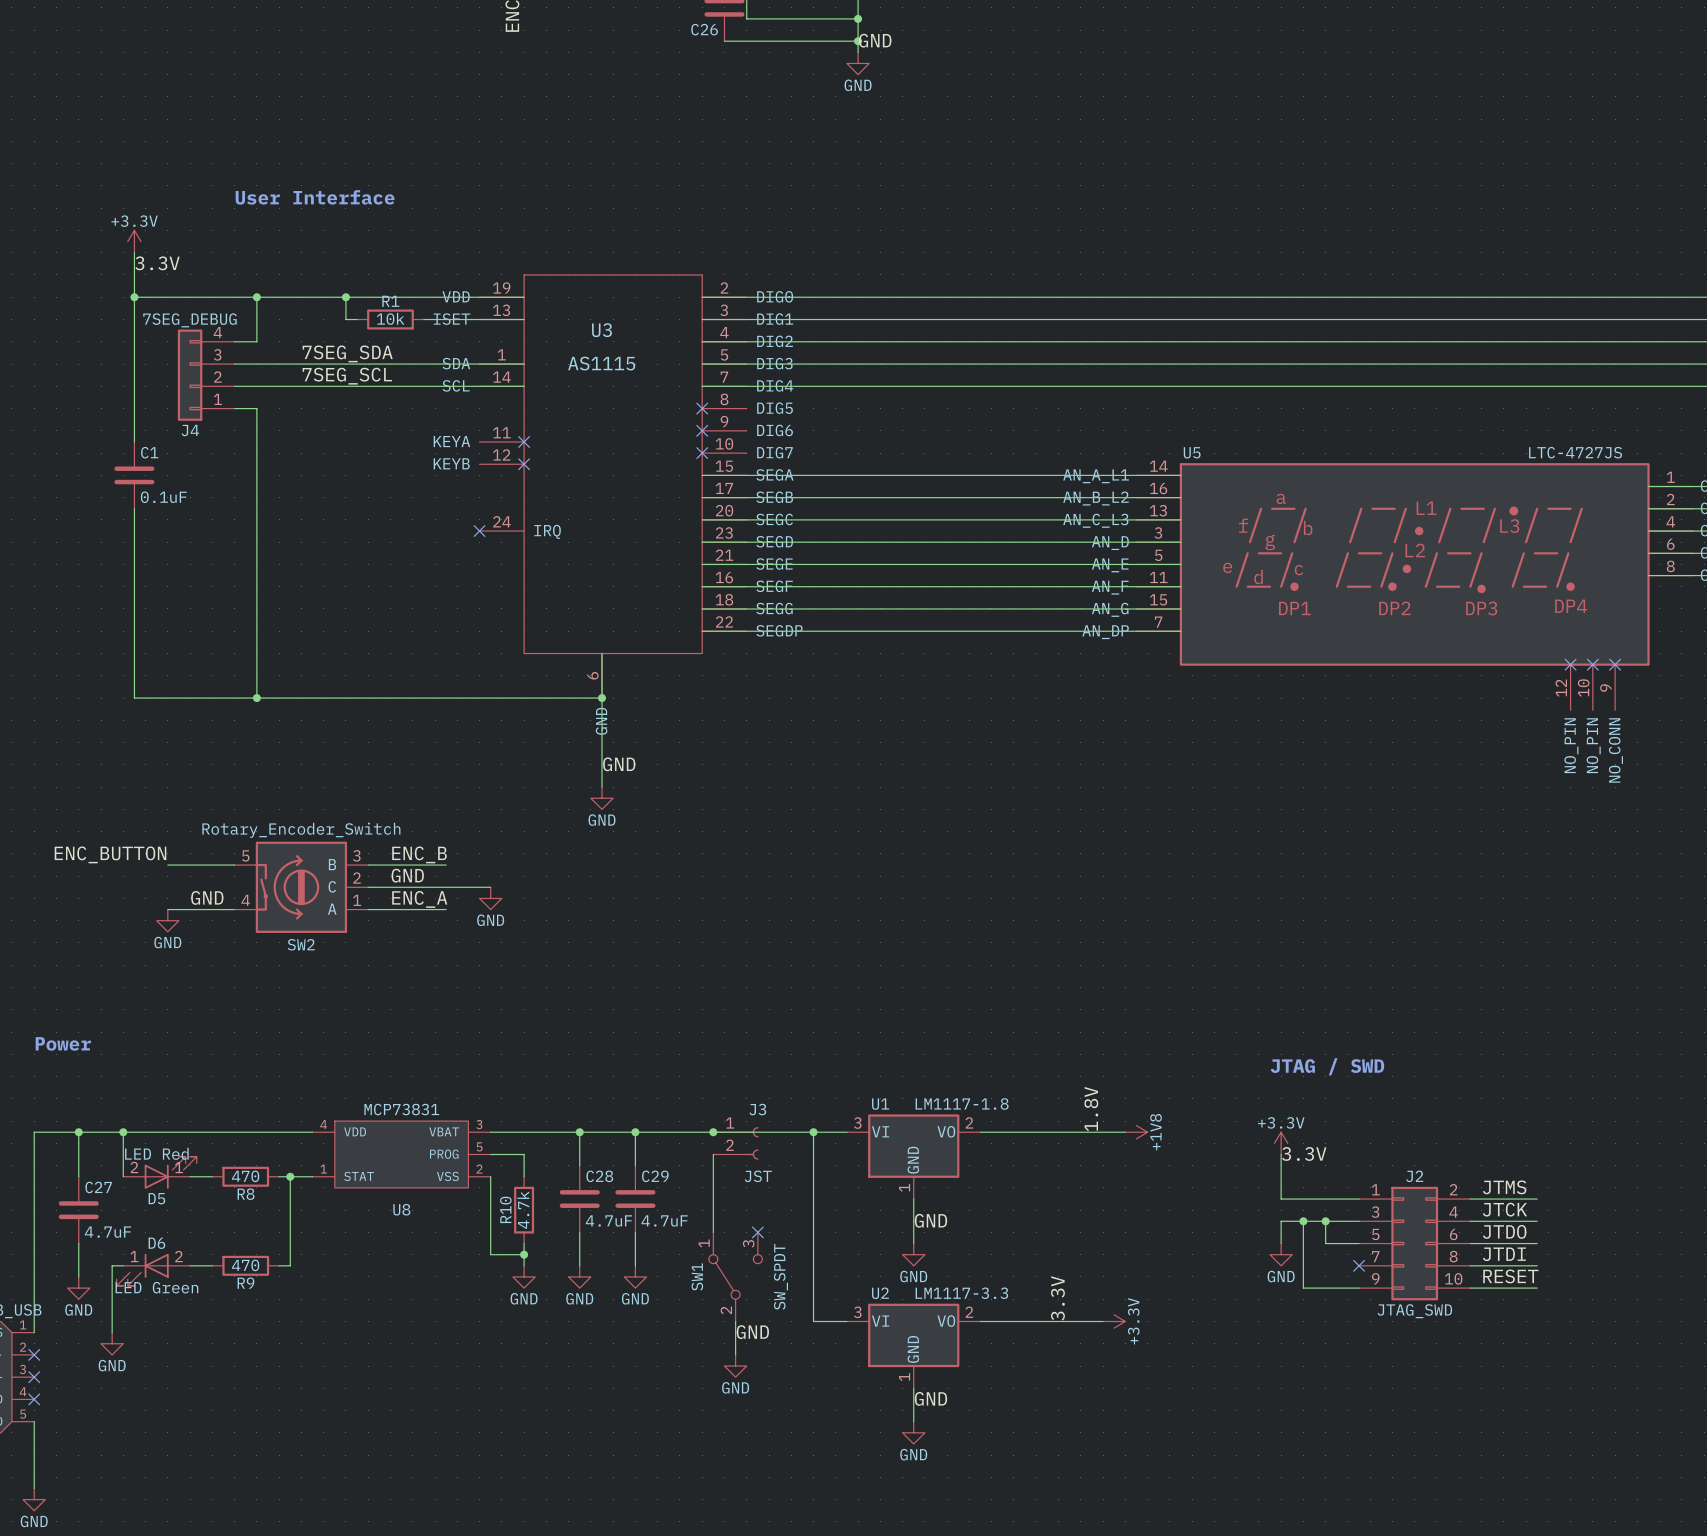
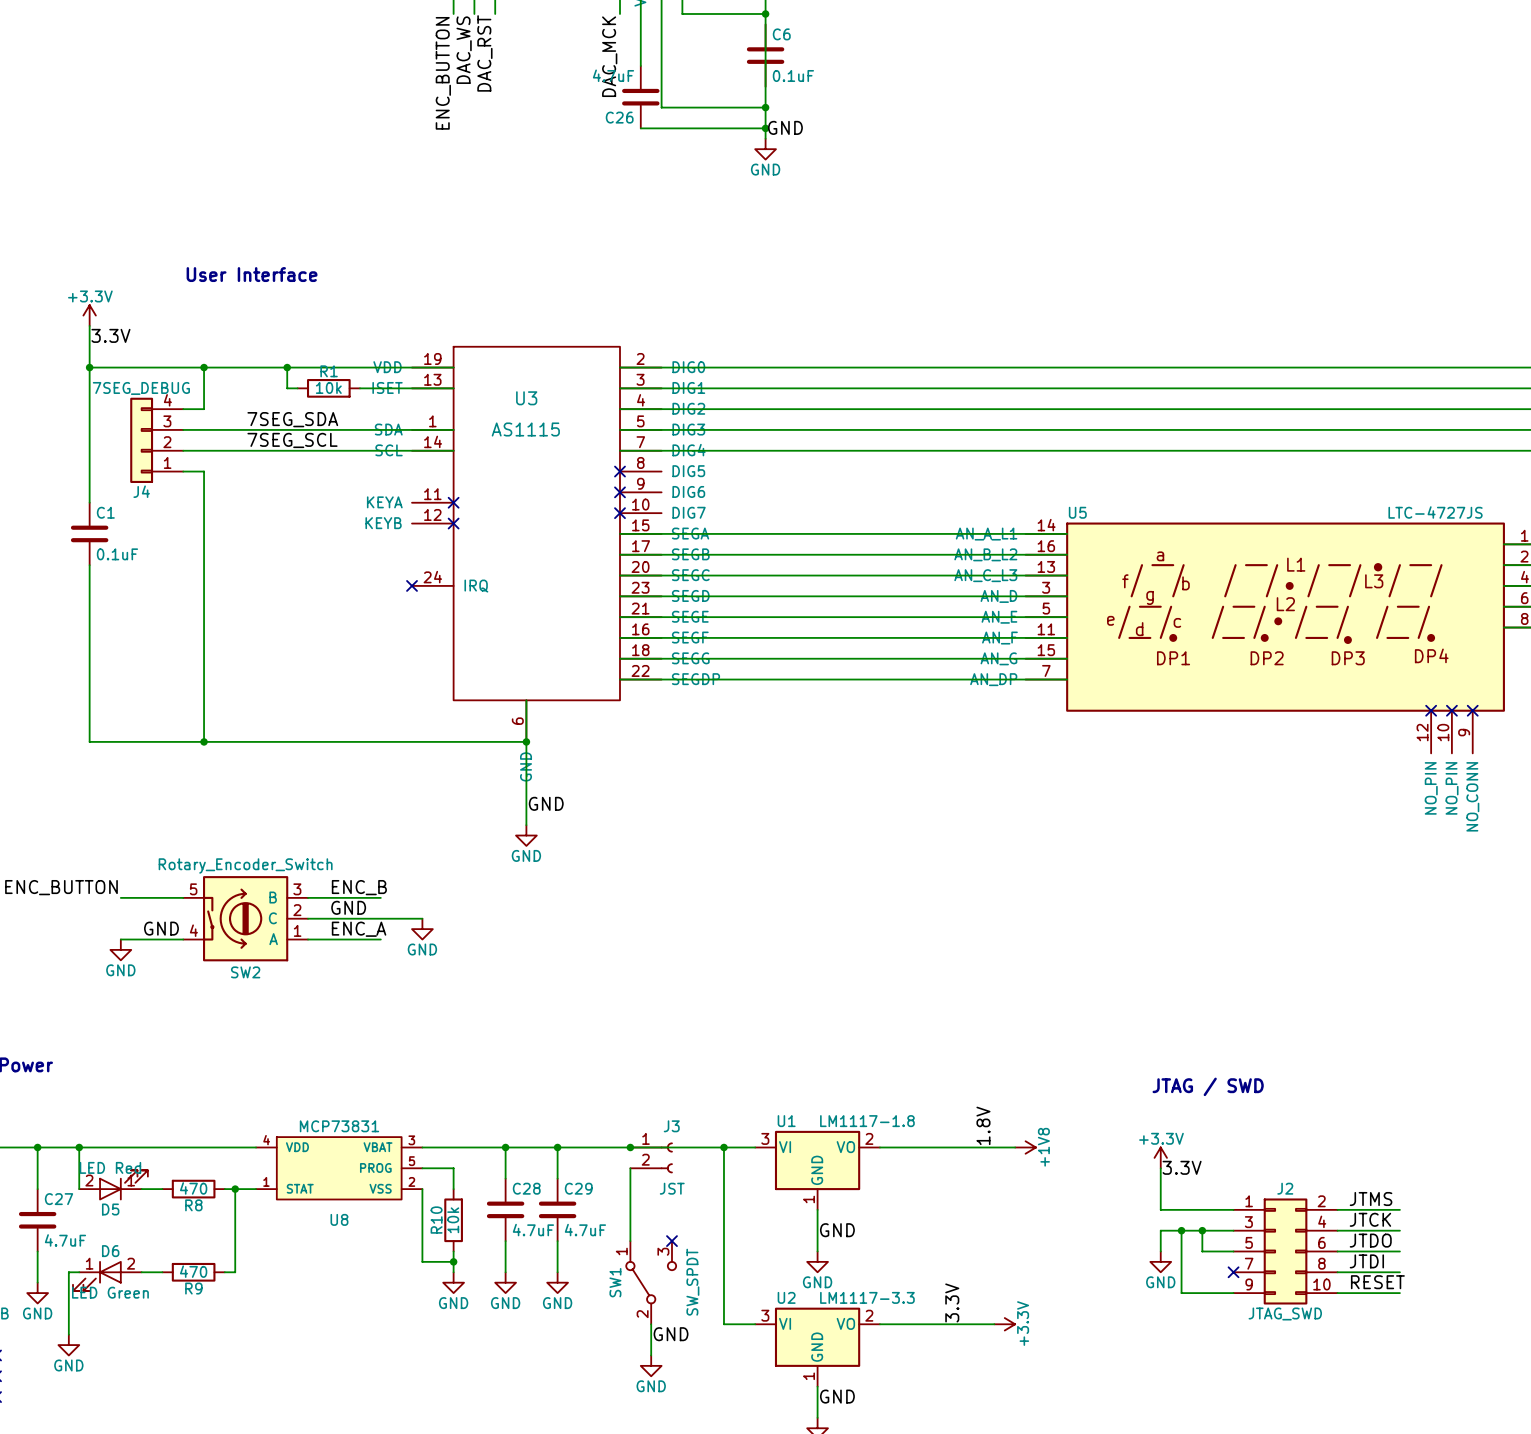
R10 value: 4.7k (523, 1210) -> 10k (453, 1220)

